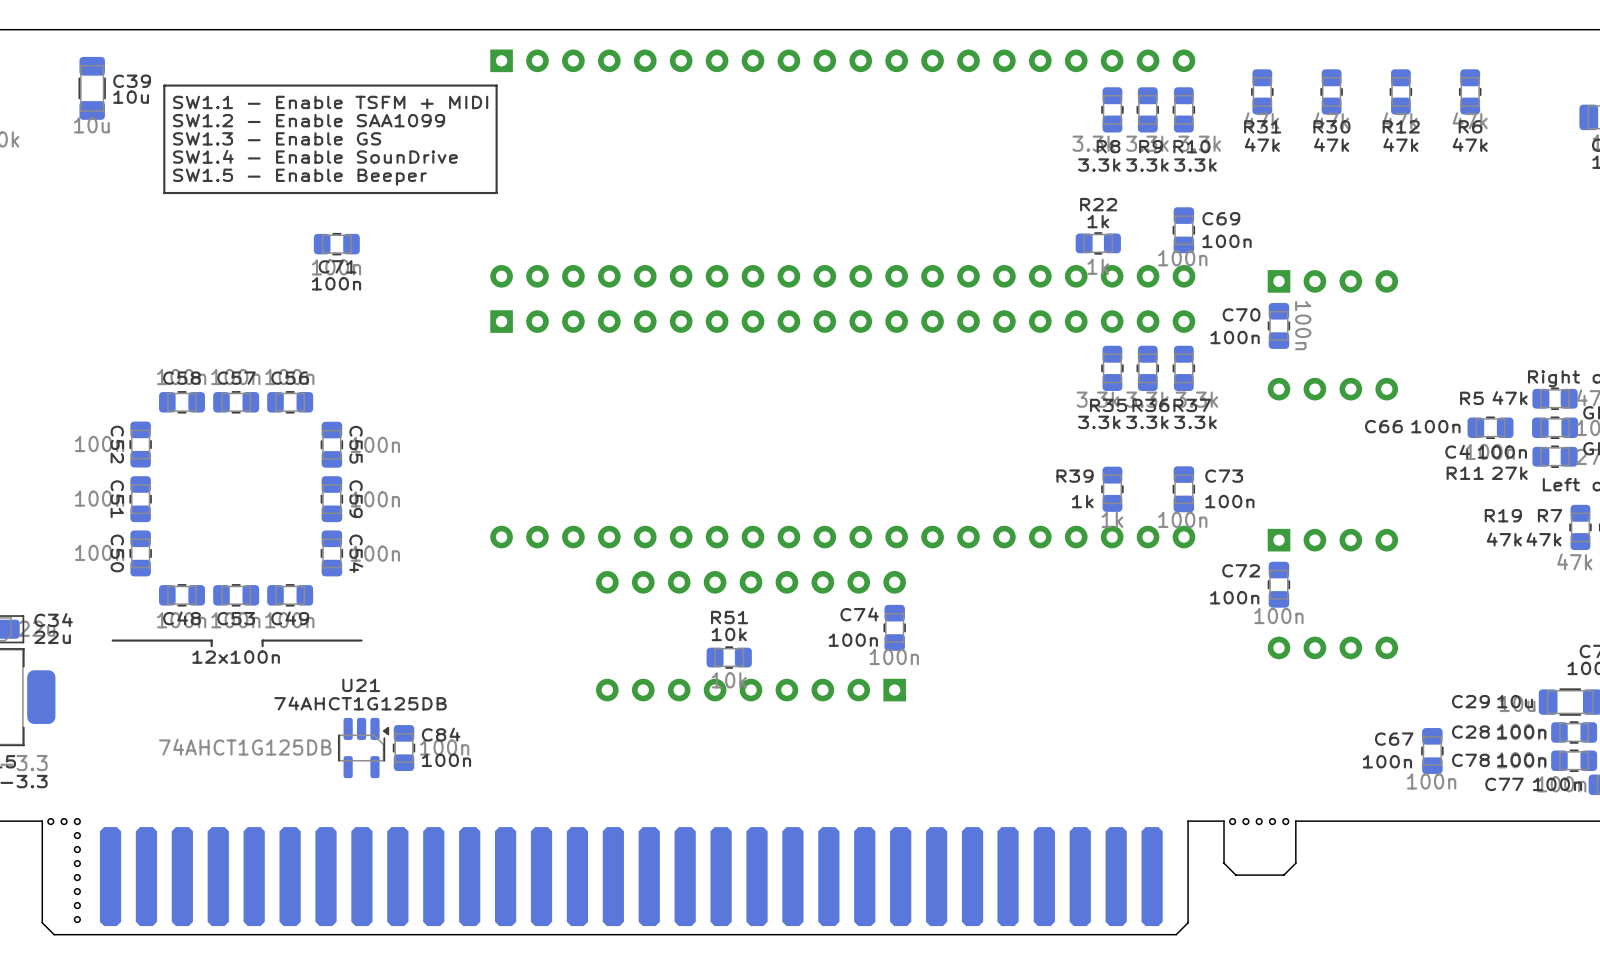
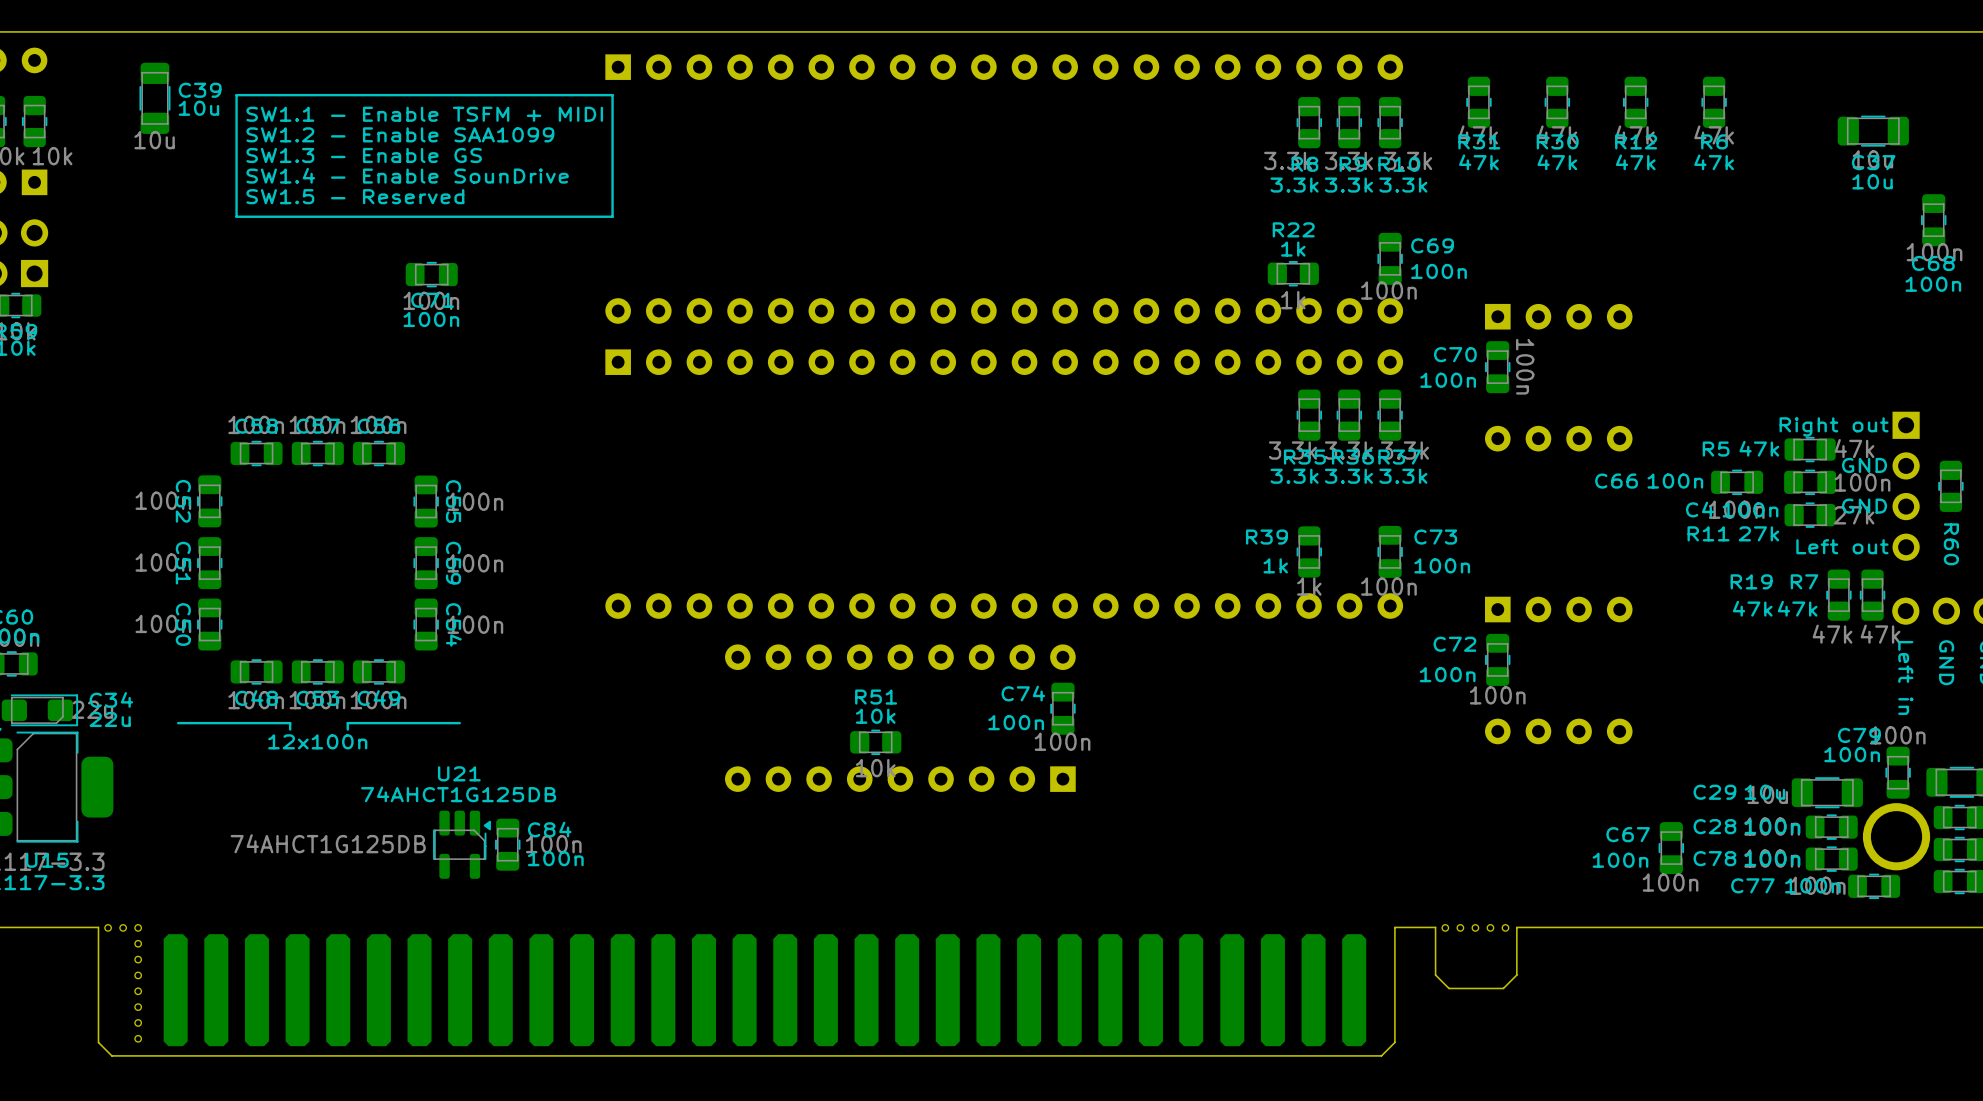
text: SW1.5 - Enable Beeper (299, 177) -> SW1.5 - Reserved (355, 196)

